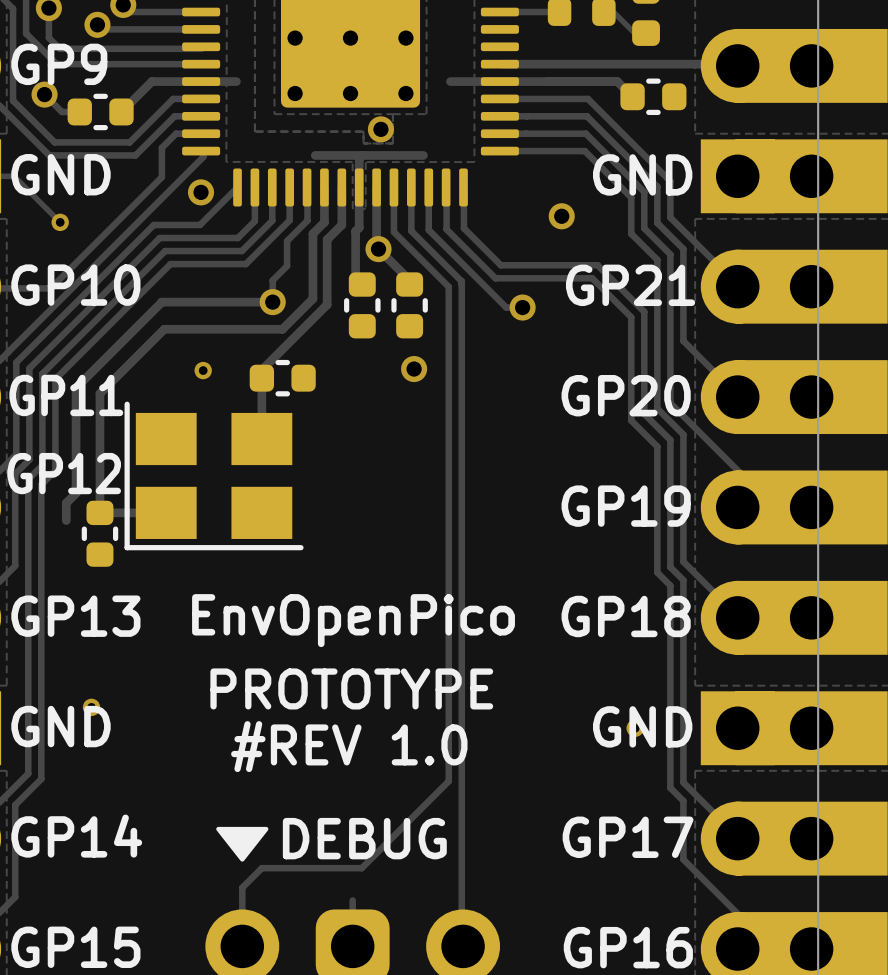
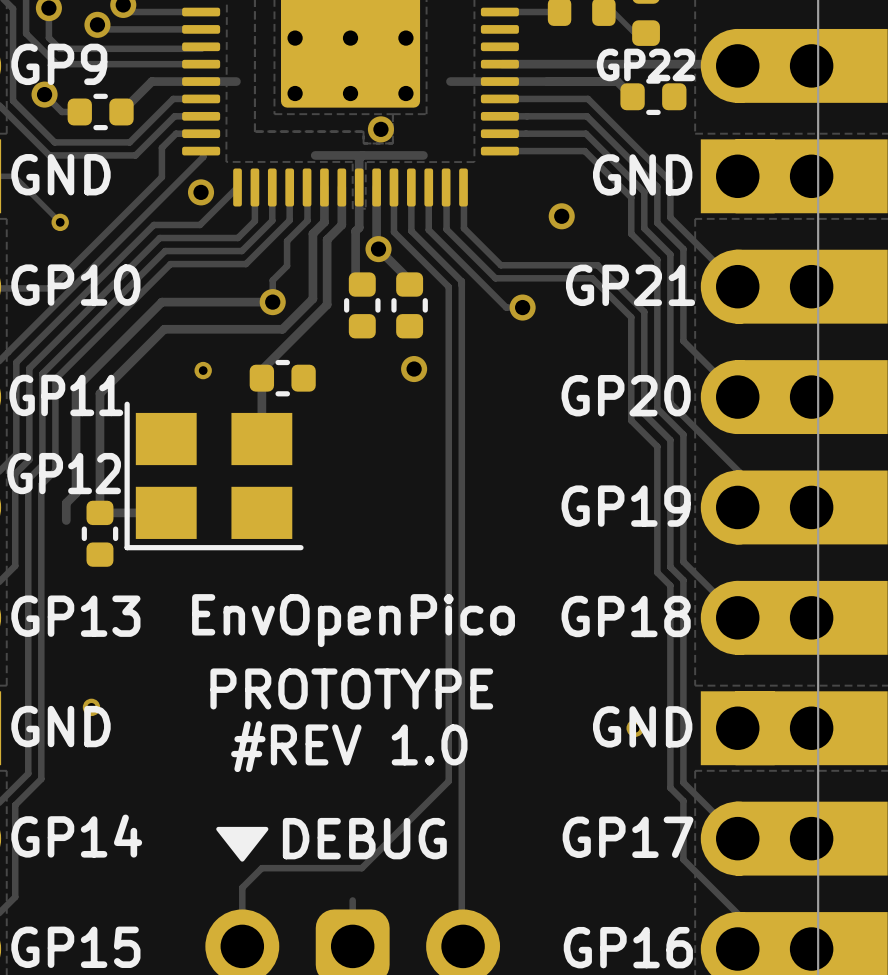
text: none -> GP22 (646, 64)

